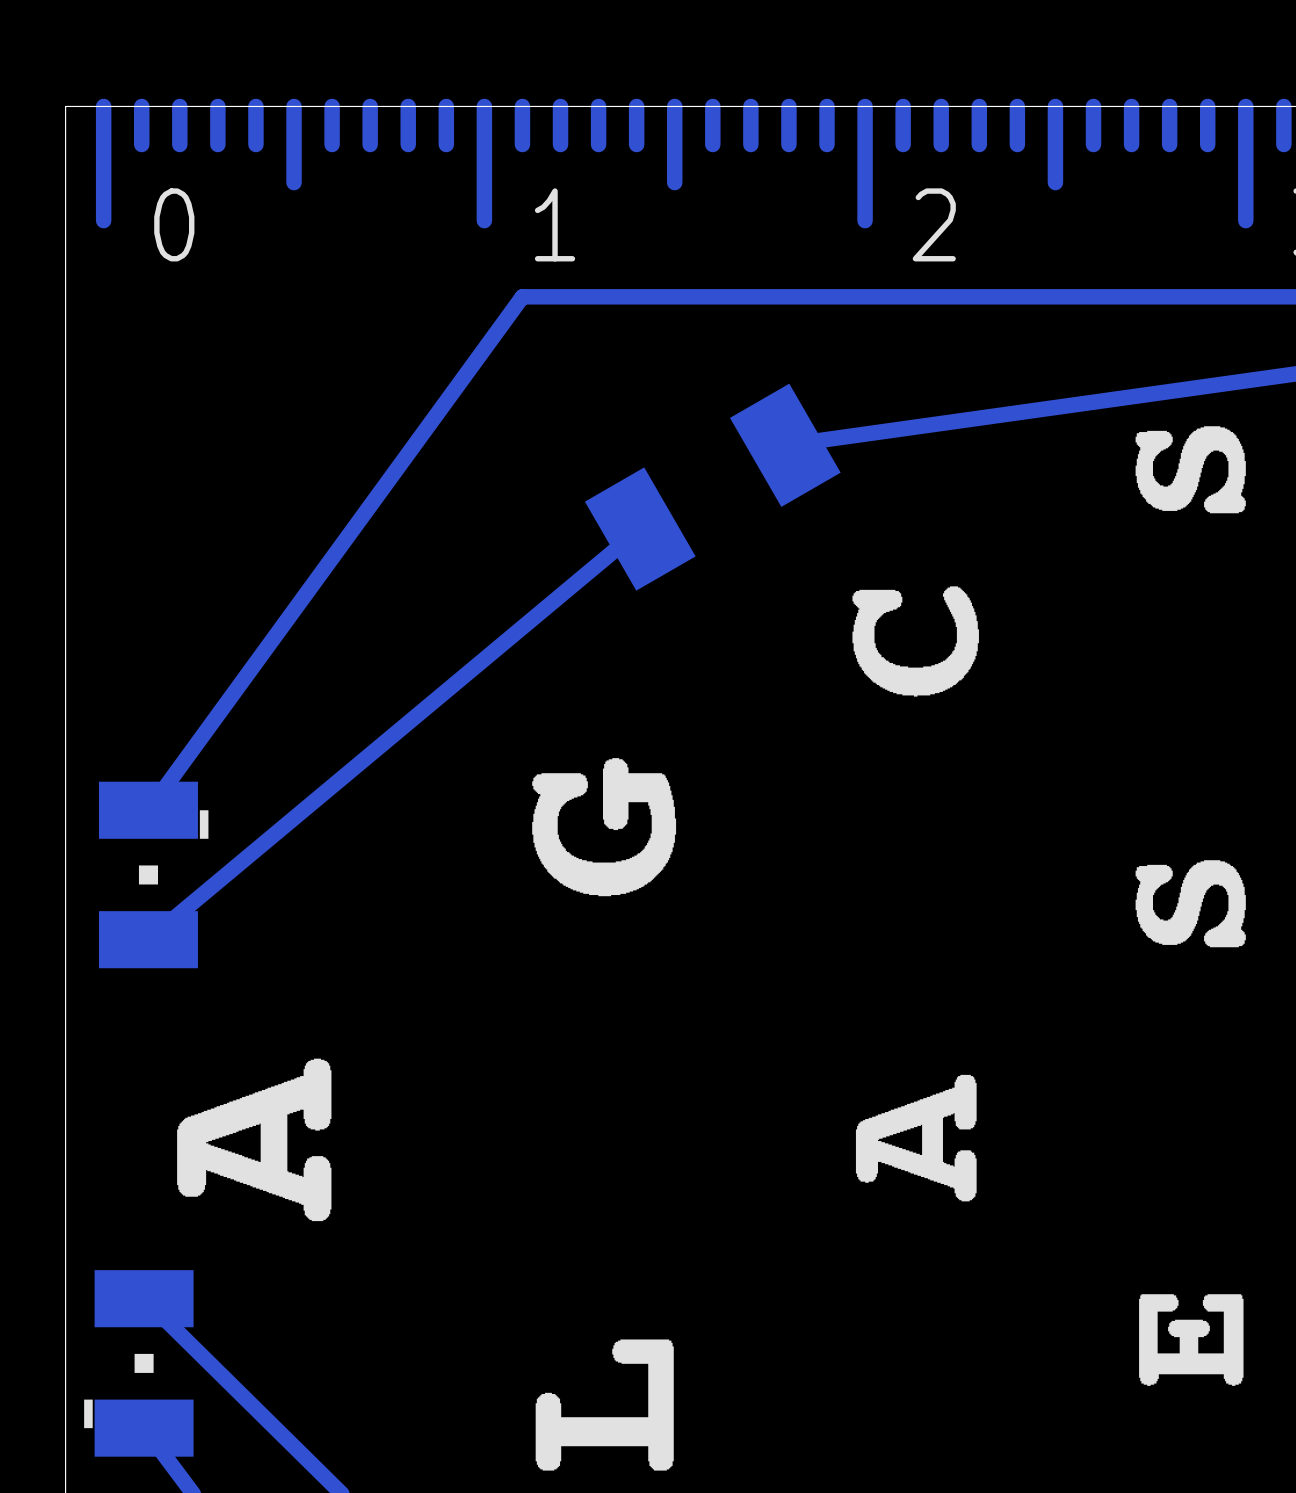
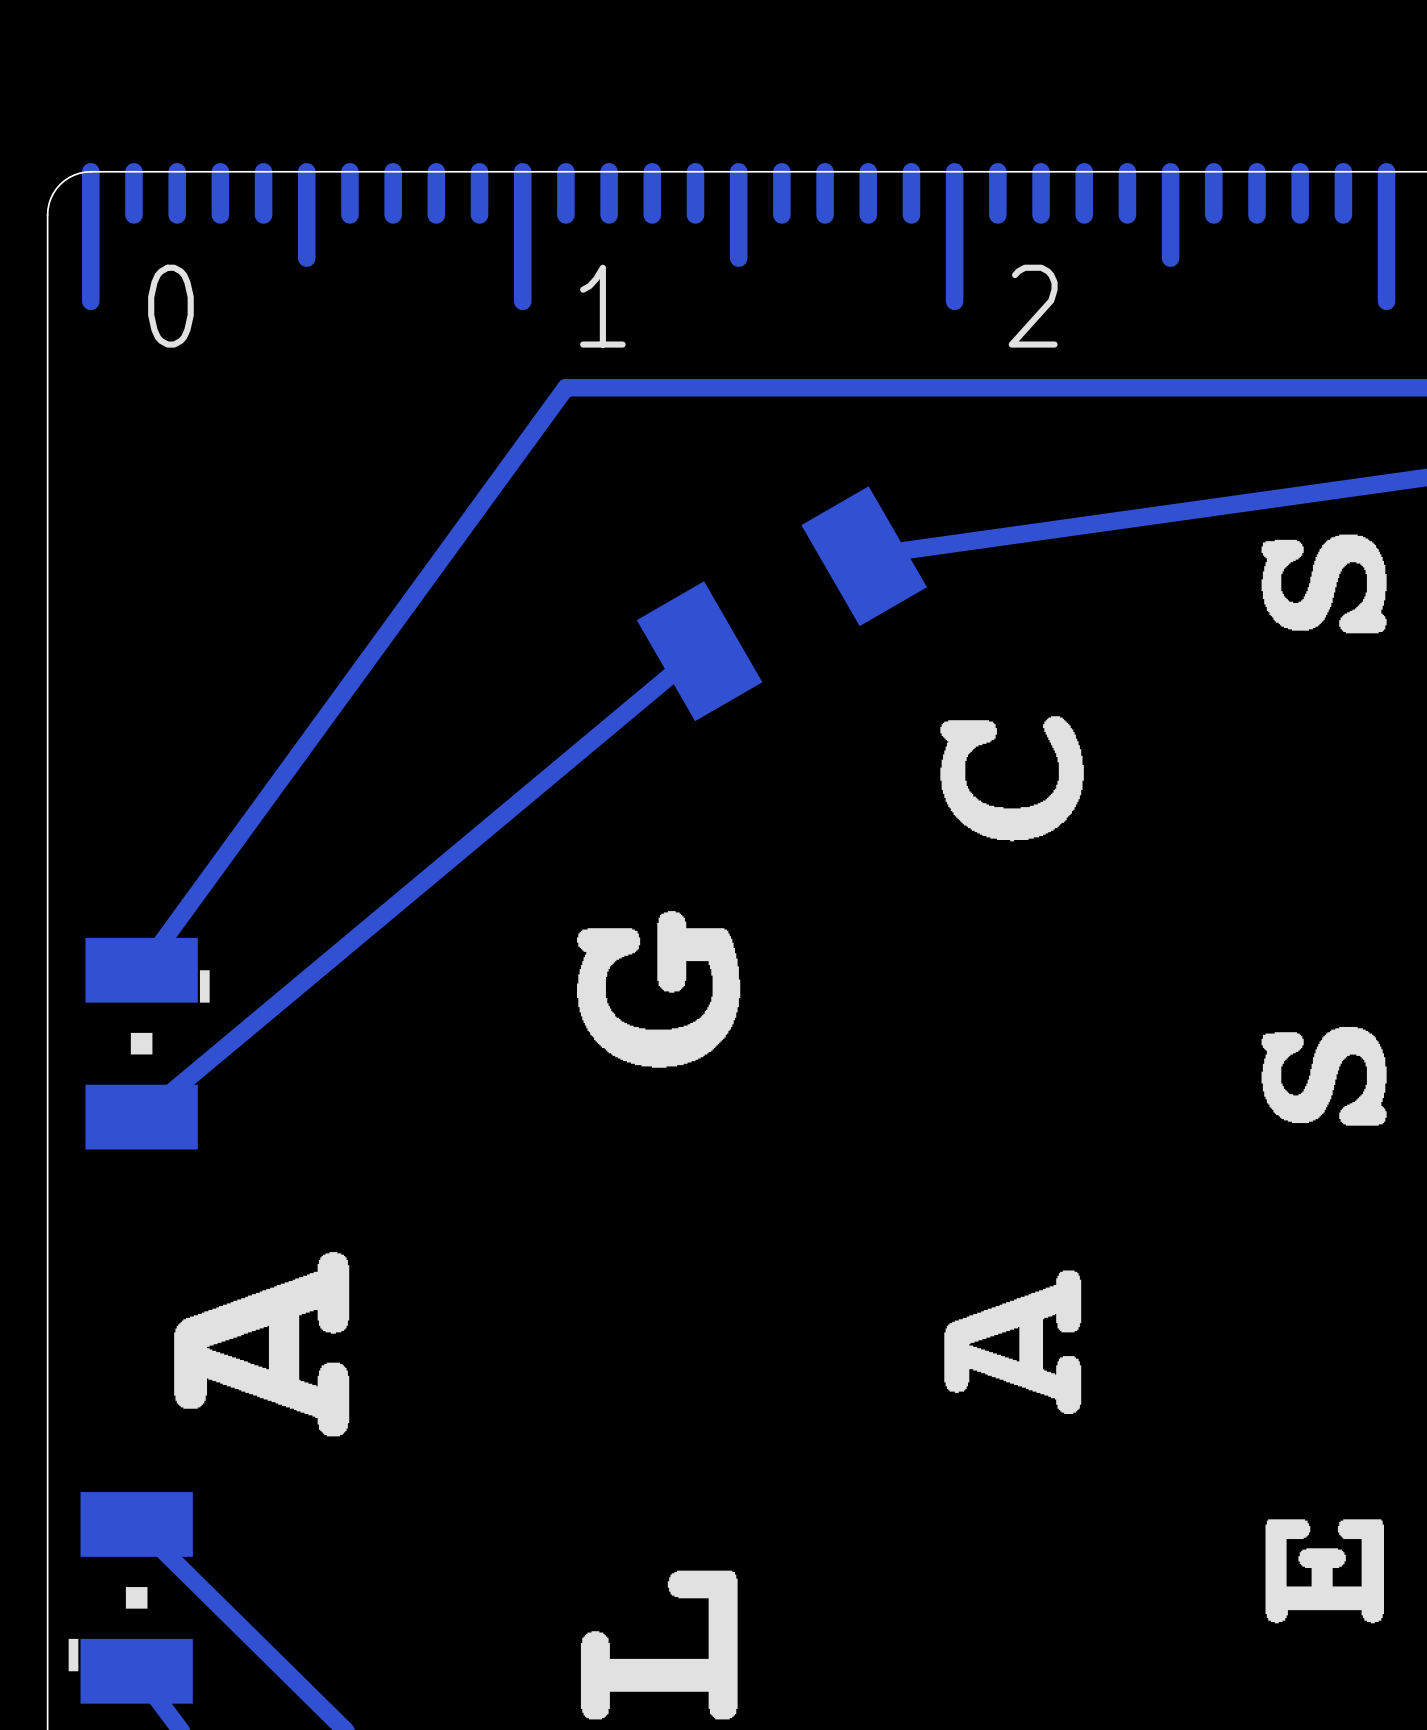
board edge: (103, 106) (65, 106) (65, 144) -> (90, 171) (74, 175) (60, 184) (50, 198) (47, 214)

